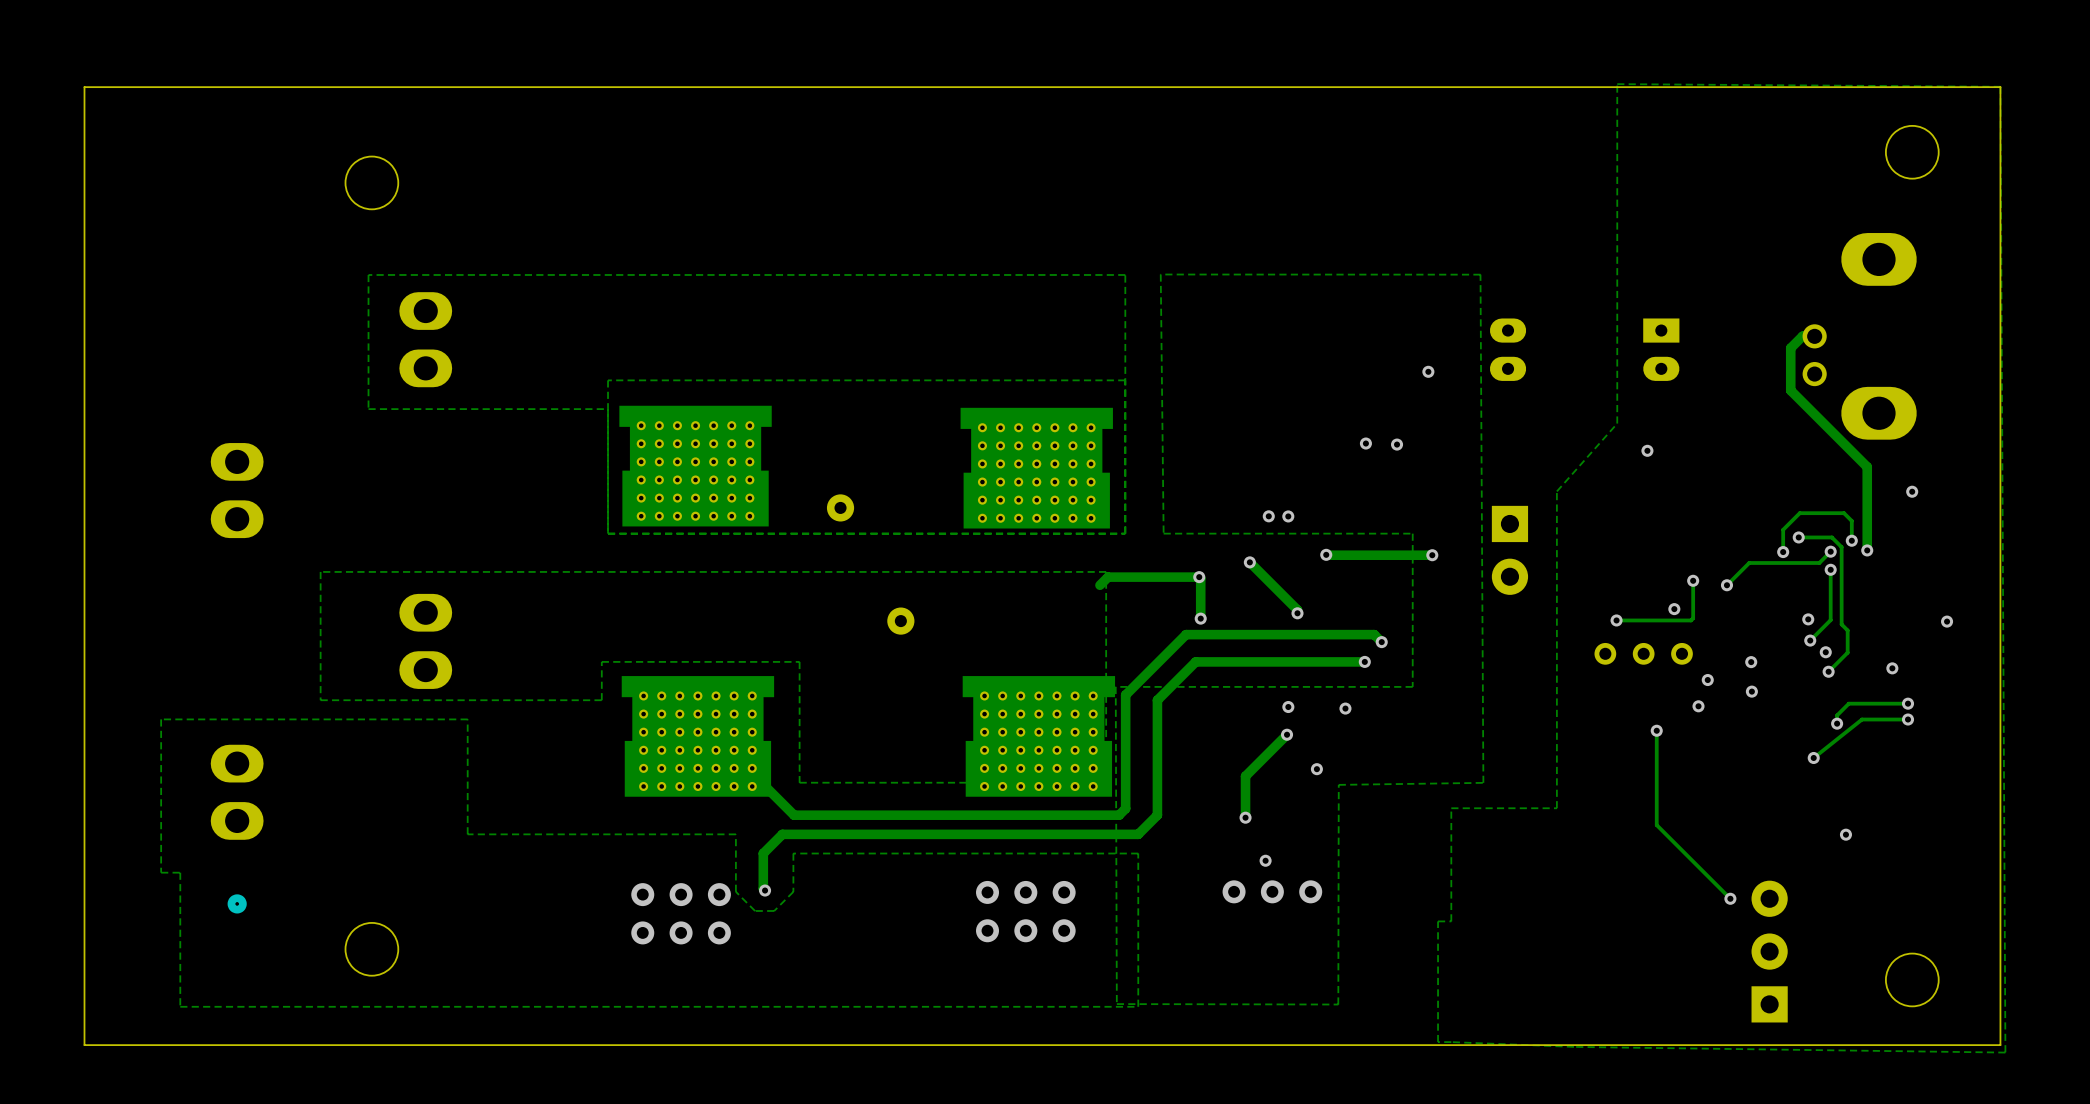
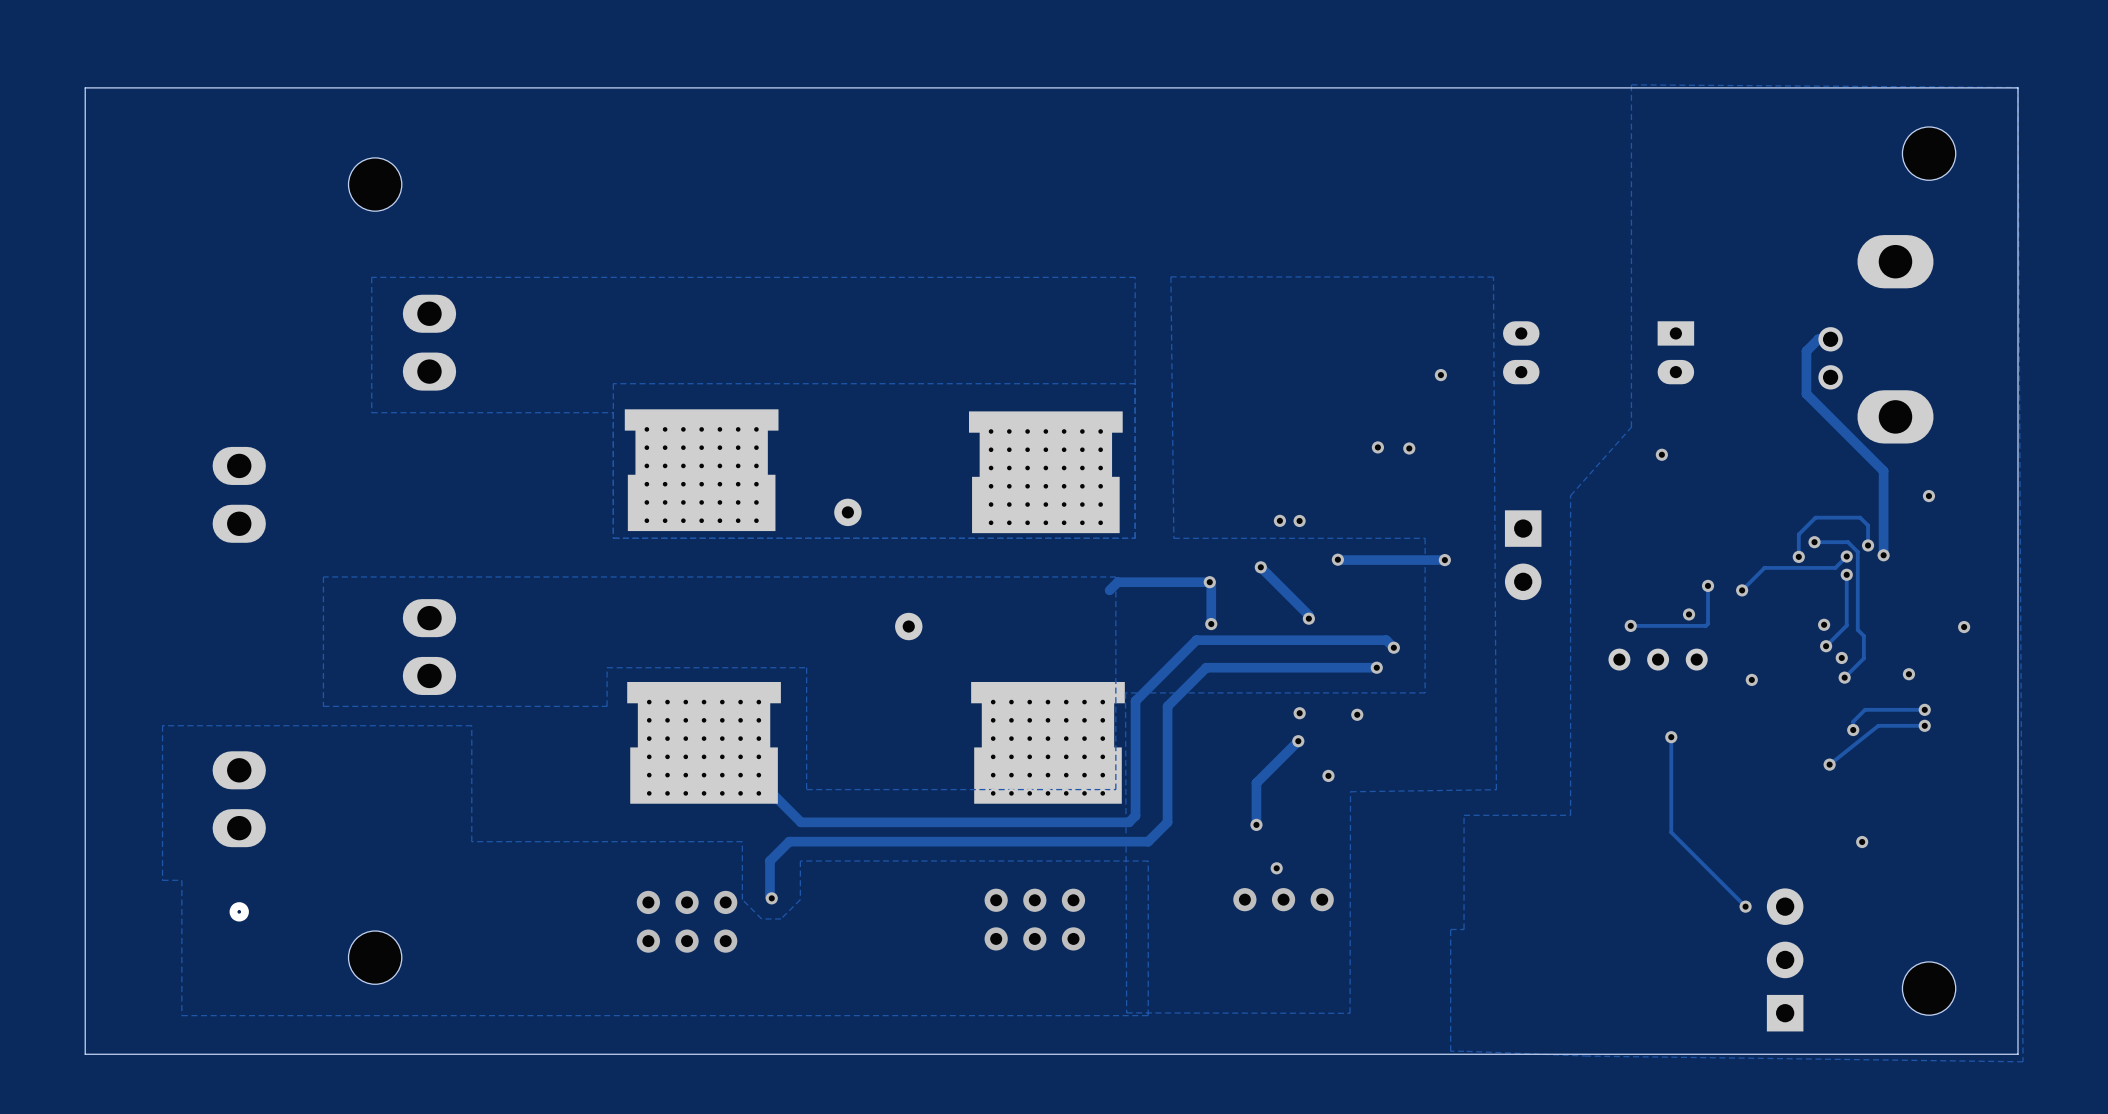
via: (1751, 662) -> none
via: none -> (1751, 679)
via: (1707, 680) -> none
via: (1751, 691) -> none
via: (1698, 706) -> none

